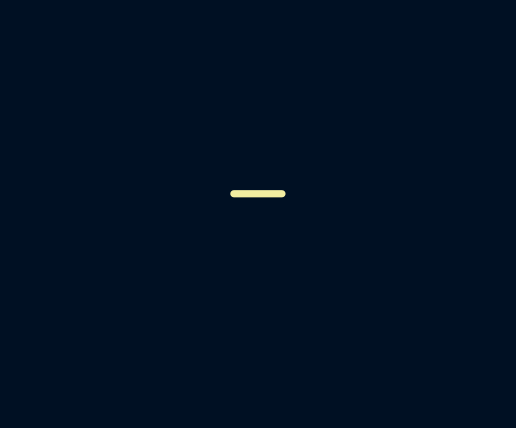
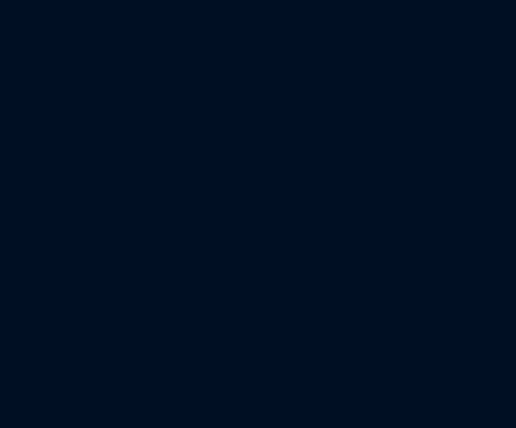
line: (233, 193) (281, 193) -> none

